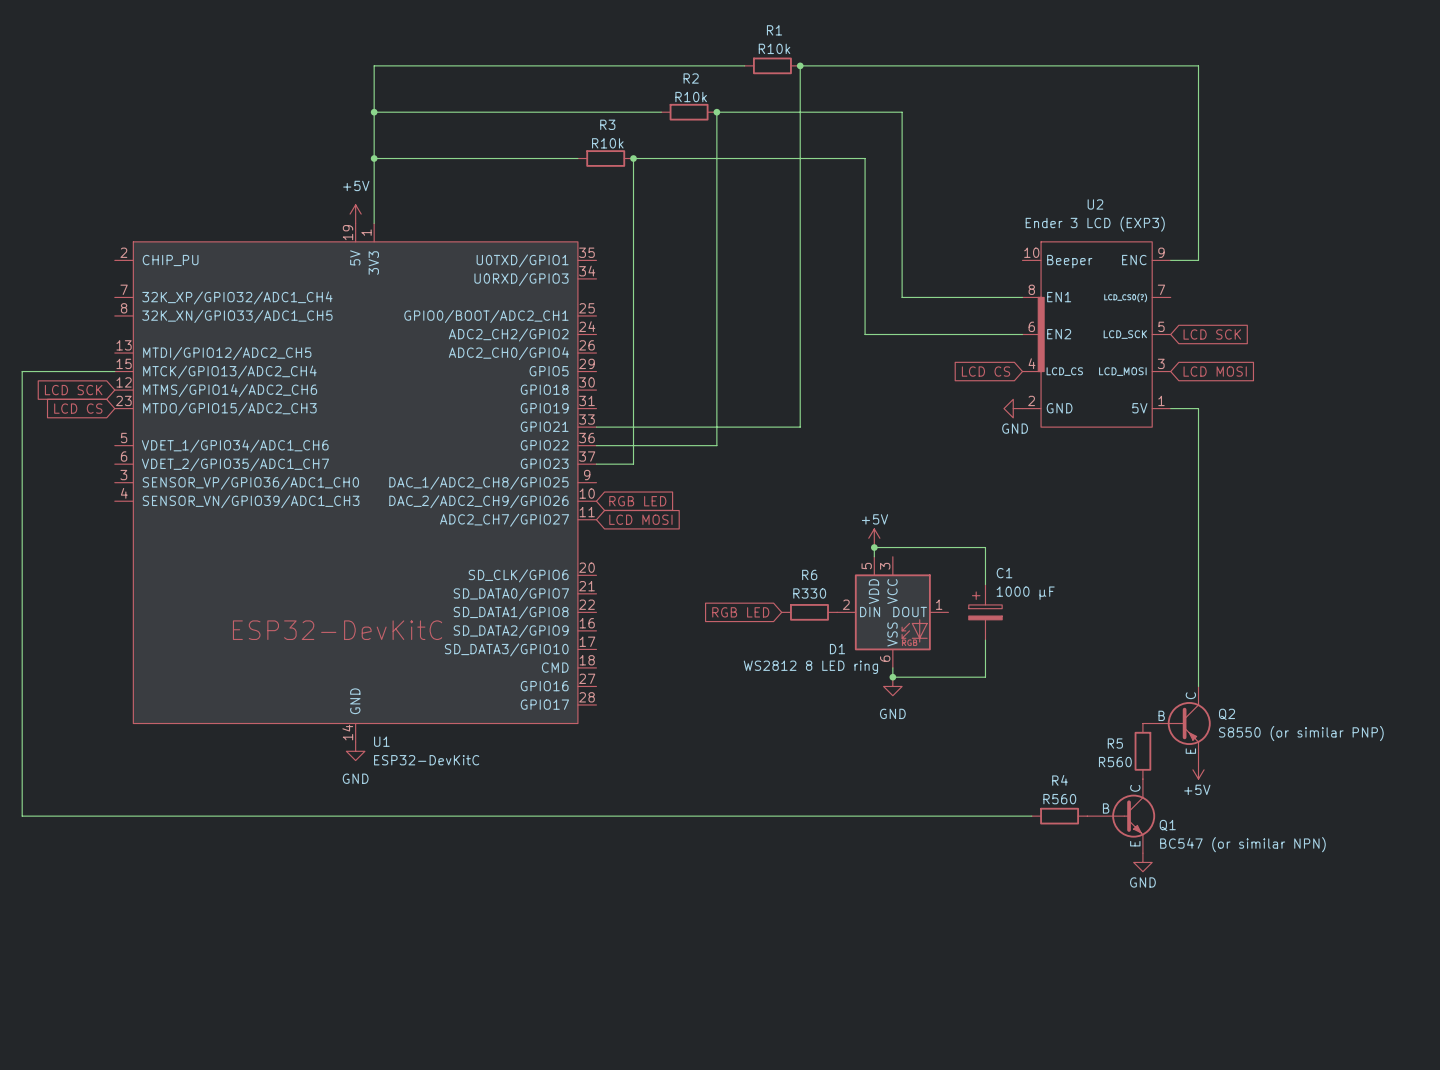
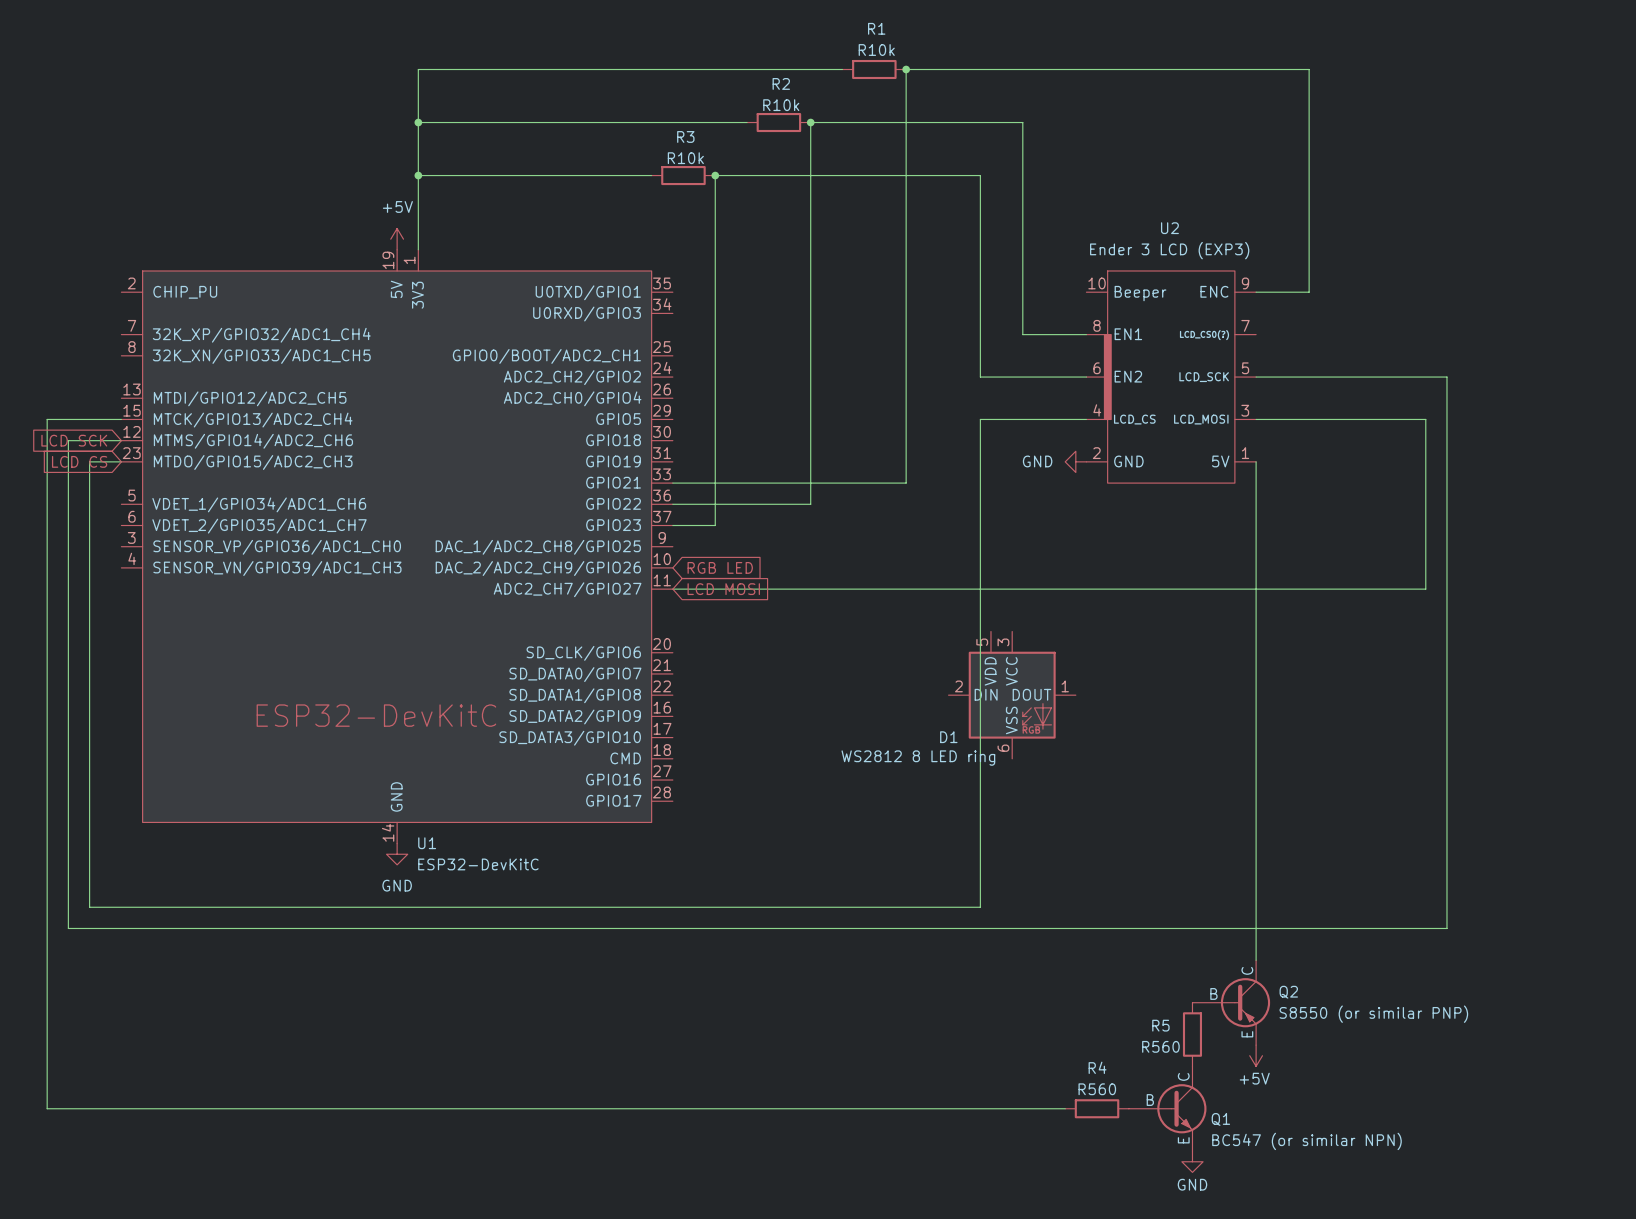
wire: (1152, 65) (1198, 65) (1198, 260) (1170, 260) -> (1309, 69) (1309, 292) (1256, 292)
wire: (957, 297) (1022, 297) -> none
wire: (957, 334) (1022, 334) -> none
U2 position: (1096, 334) -> (1171, 377)
wire: none -> (1256, 377) (1446, 377) (1446, 928) (1171, 928)
global label: LCD SCK (1212, 334) -> none
wire: (49, 371) (22, 371) (22, 816) (68, 816) -> (121, 440) (68, 440) (68, 928)
wire: none -> (47, 419) (47, 1108) (1065, 1108)
wire: none -> (1086, 419) (980, 419) (980, 907) (89, 907) (89, 461) (121, 461)
global label: LCD CS (986, 371) -> none
wire: none -> (1256, 419) (1425, 419) (1425, 589) (672, 589)
global label: LCD MOSI (1215, 371) -> none
power symbol position: GND (1013, 408) -> GND (1075, 461)
wire: none -> (1256, 461) (1256, 960)
wire: (1170, 408) (1198, 408) (1198, 686) -> none
power symbol text position: GND (1015, 428) -> GND (1037, 461)
power symbol: +5V (874, 538) -> none
junction: (874, 547) -> none
wire: (874, 556) (874, 547) (985, 547) (985, 584) -> none
global label: RGB LED (740, 612) -> none
R6: R330 (809, 612) -> none
C1: 1000 μF (985, 612) -> none
wire: (985, 640) (985, 677) (892, 677) (892, 667) -> none
junction: (892, 677) -> none
power symbol: GND (892, 686) -> none
Q2 position: (1176, 723) -> (1231, 1002)
R5 position: (1142, 751) -> (1192, 1034)
power symbol: +5V (1198, 769) -> none
R4 position: (1059, 816) -> (1097, 1108)
Q1 position: (1121, 816) -> (1167, 1108)
power symbol: GND (1142, 862) -> none
power symbol: none -> +5V (1256, 1055)
power symbol: none -> GND (1192, 1161)

